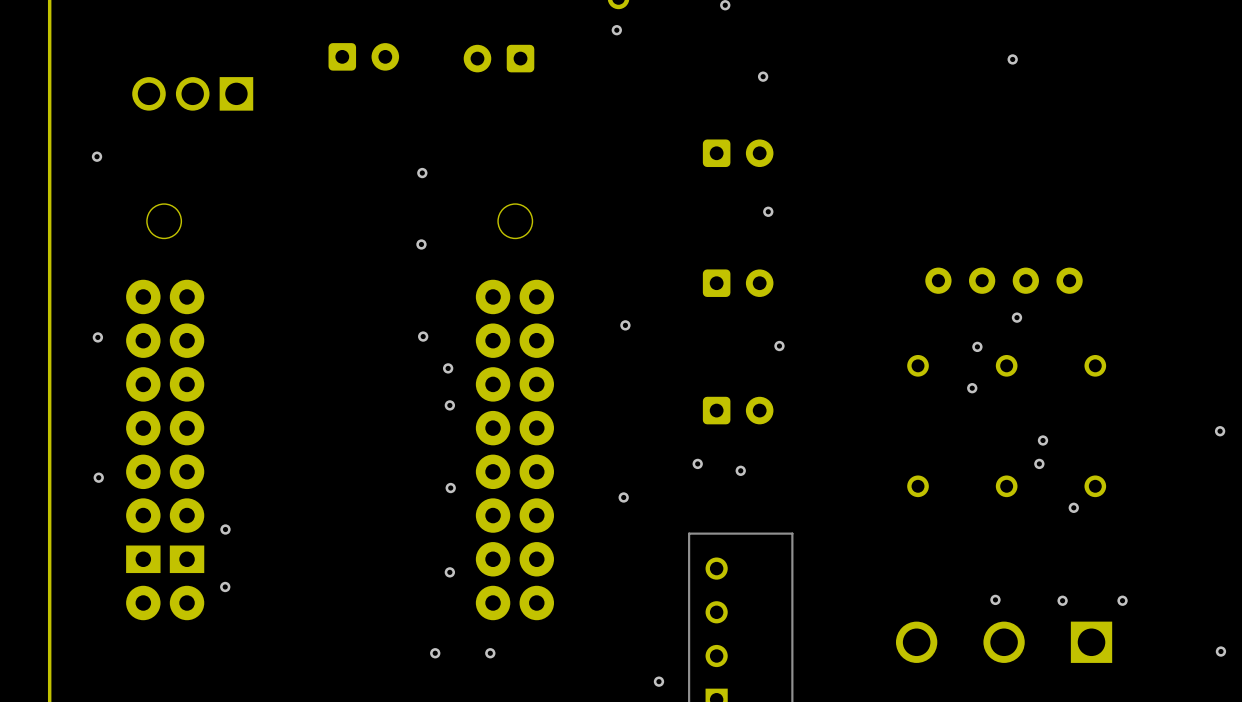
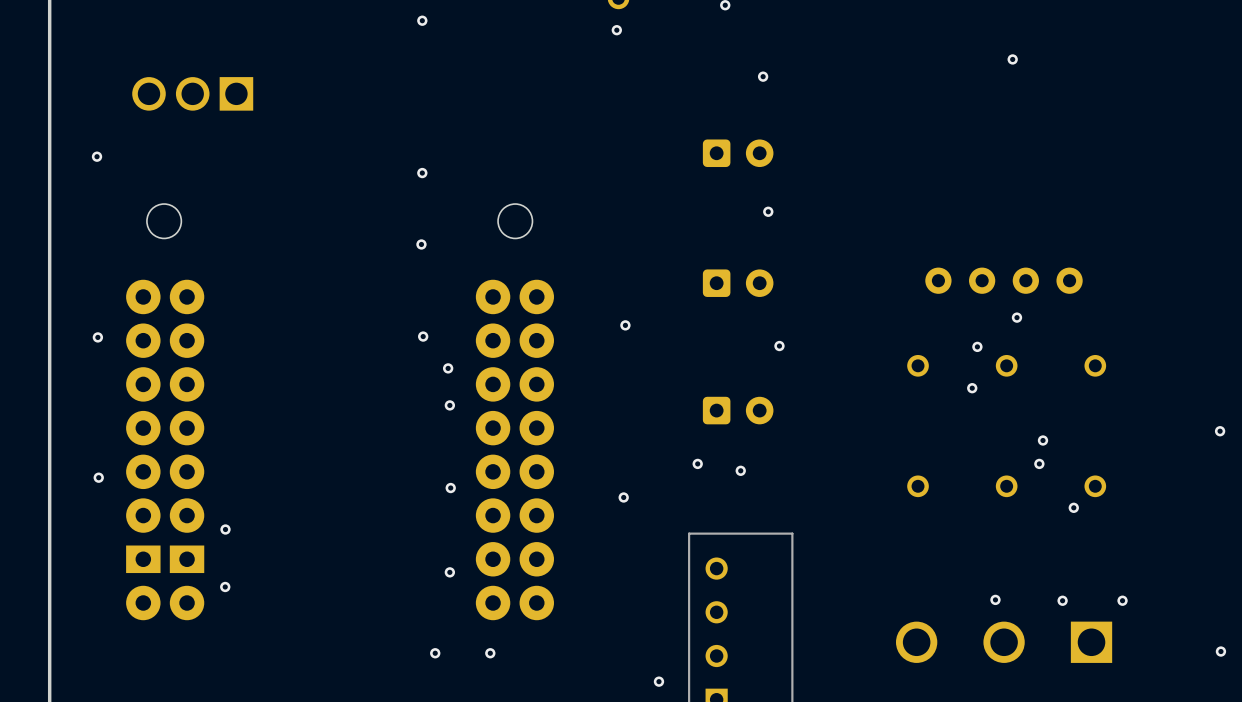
via: none -> (422, 20)
part: (363, 56) -> none
part: (499, 58) -> none

